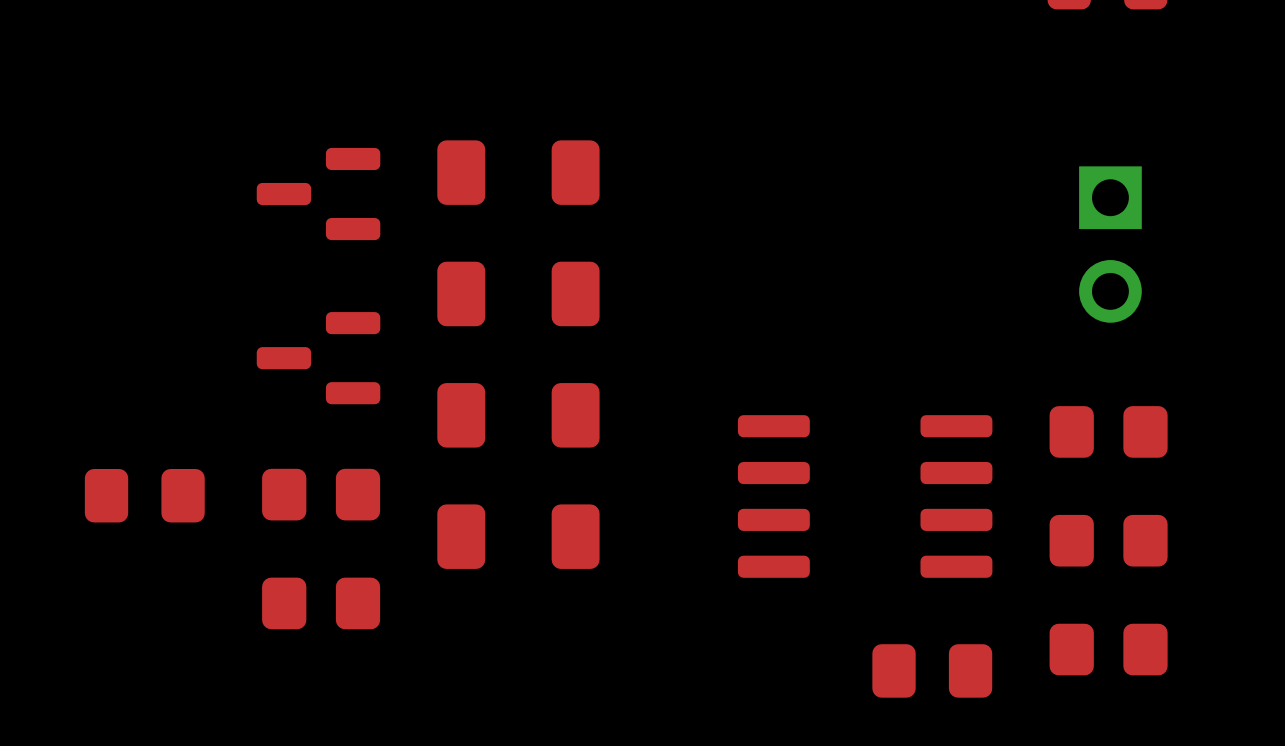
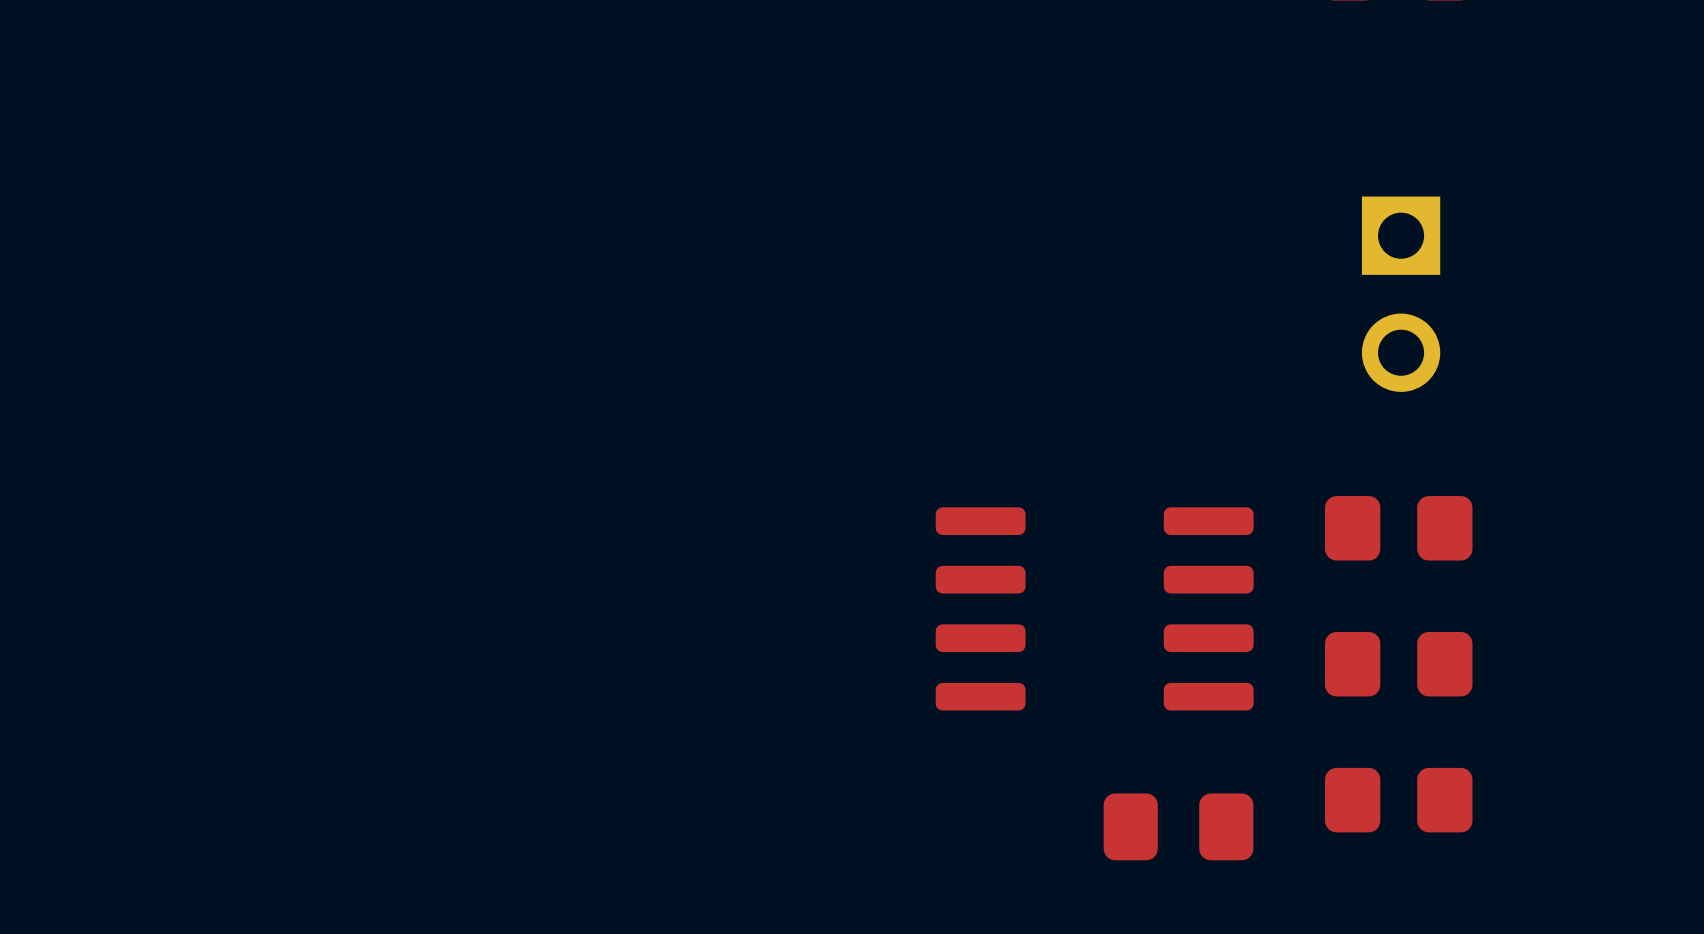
part: (518, 172) -> none
part: (318, 194) -> none
part: (518, 293) -> none
part: (318, 358) -> none
part: (518, 415) -> none
part: (321, 494) -> none
part: (144, 495) -> none
part: (518, 536) -> none
part: (321, 603) -> none

